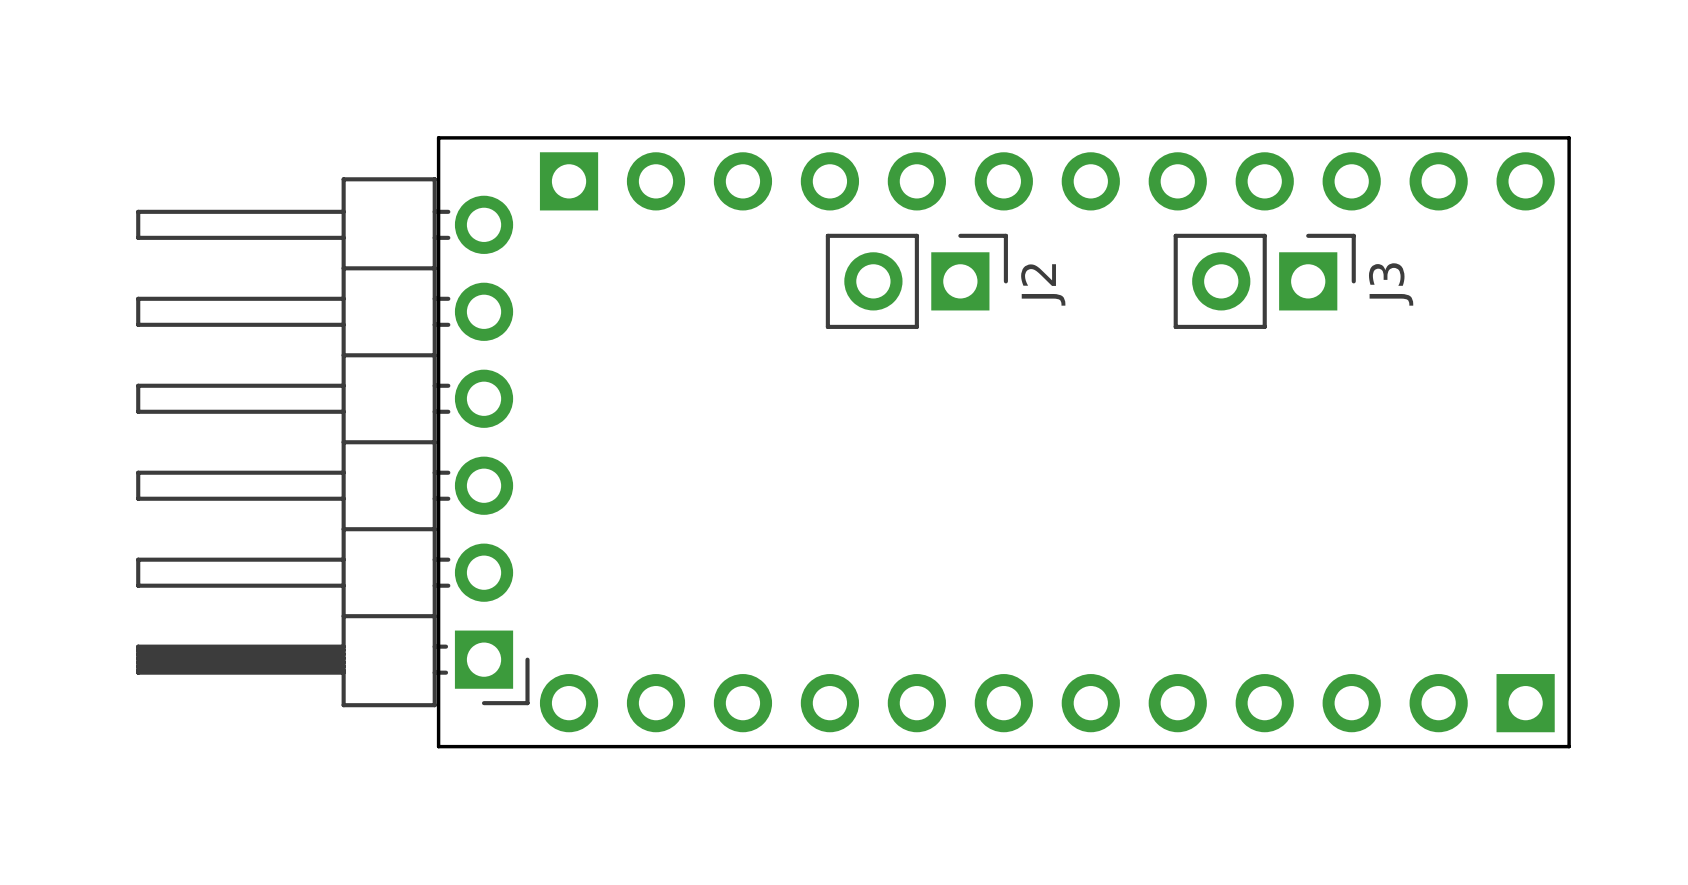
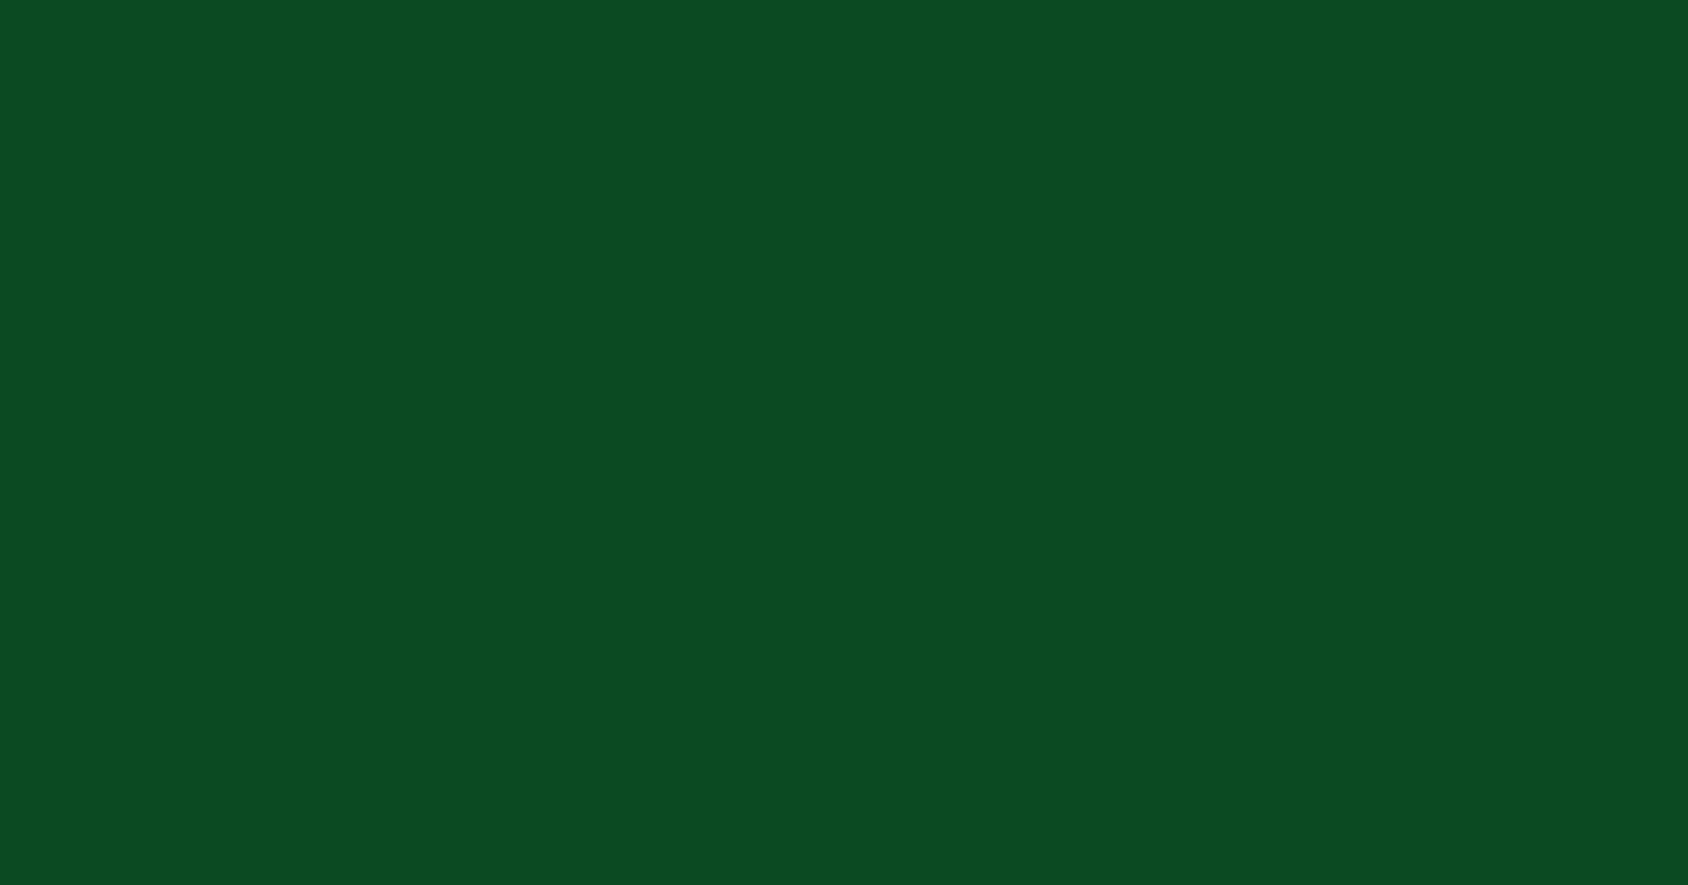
board edge: (438, 137) (1569, 137) (1569, 746) (438, 746) (438, 137) -> none
part: (1047, 181) -> none
J2: (916, 281) -> none
J3: (1264, 281) -> none
part: (332, 442) -> none
part: (1047, 703) -> none

